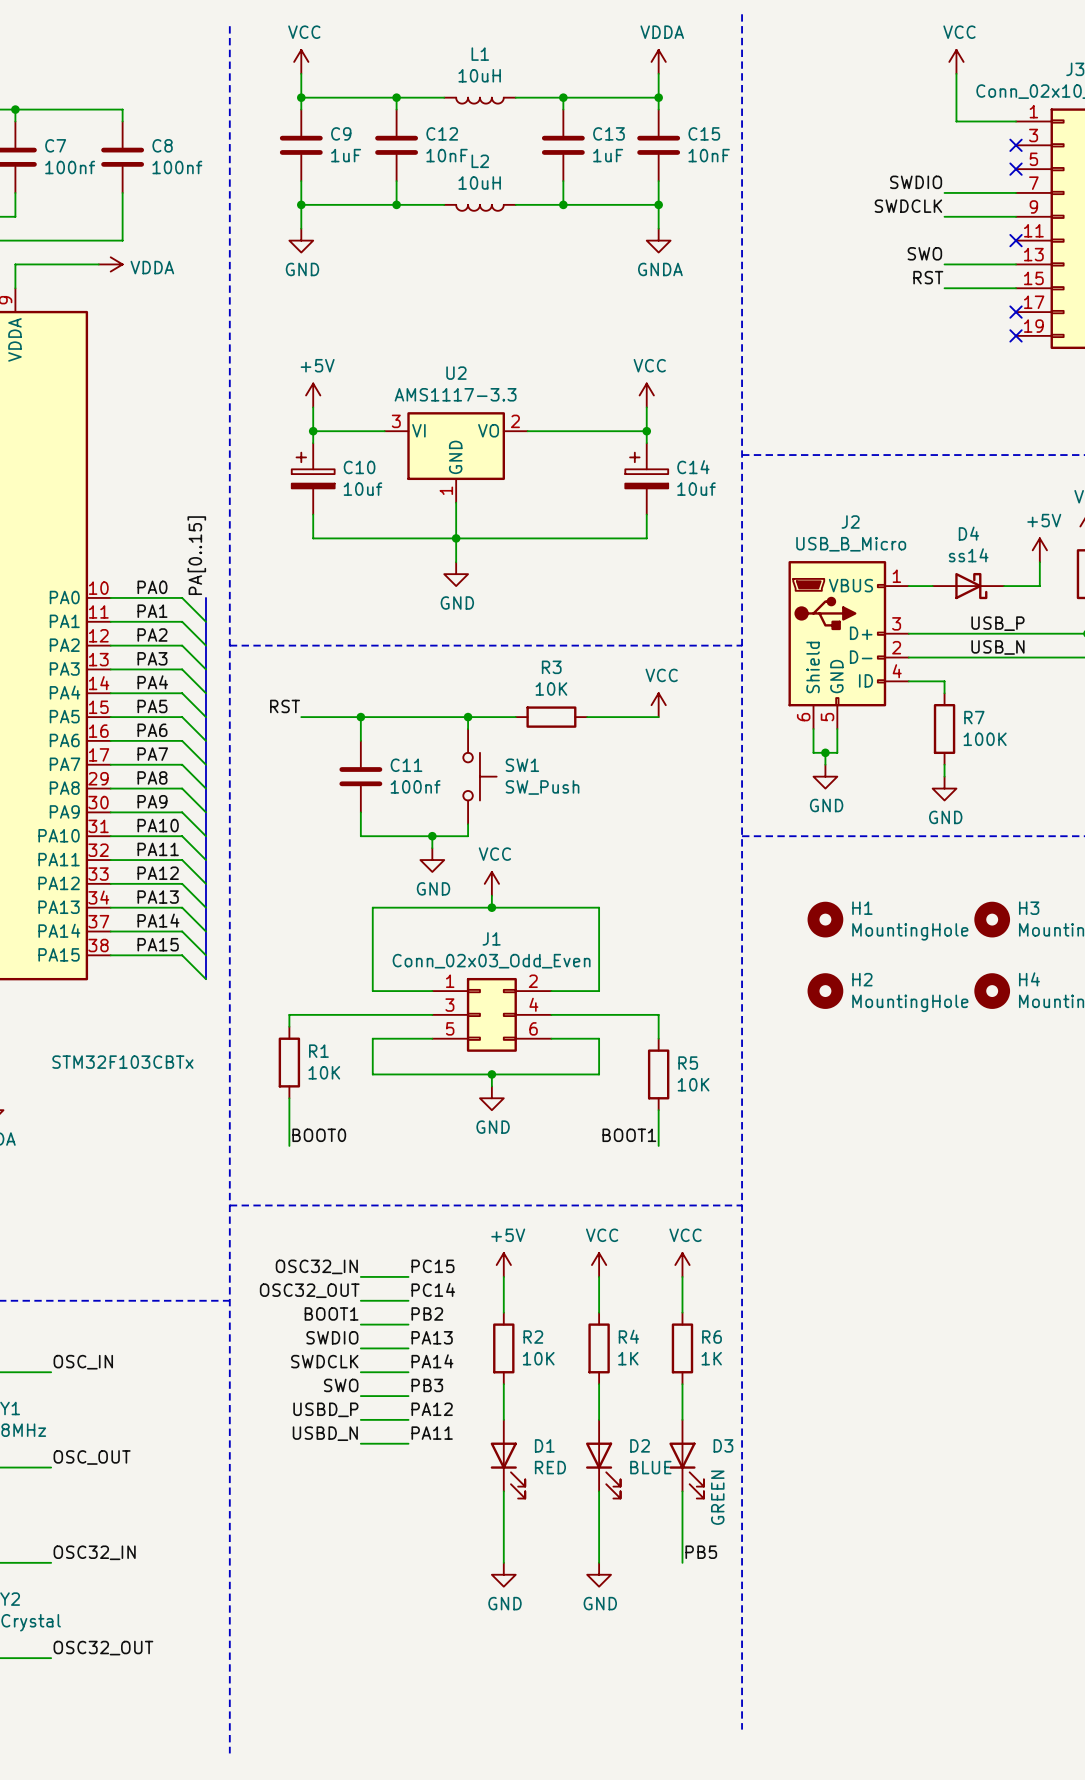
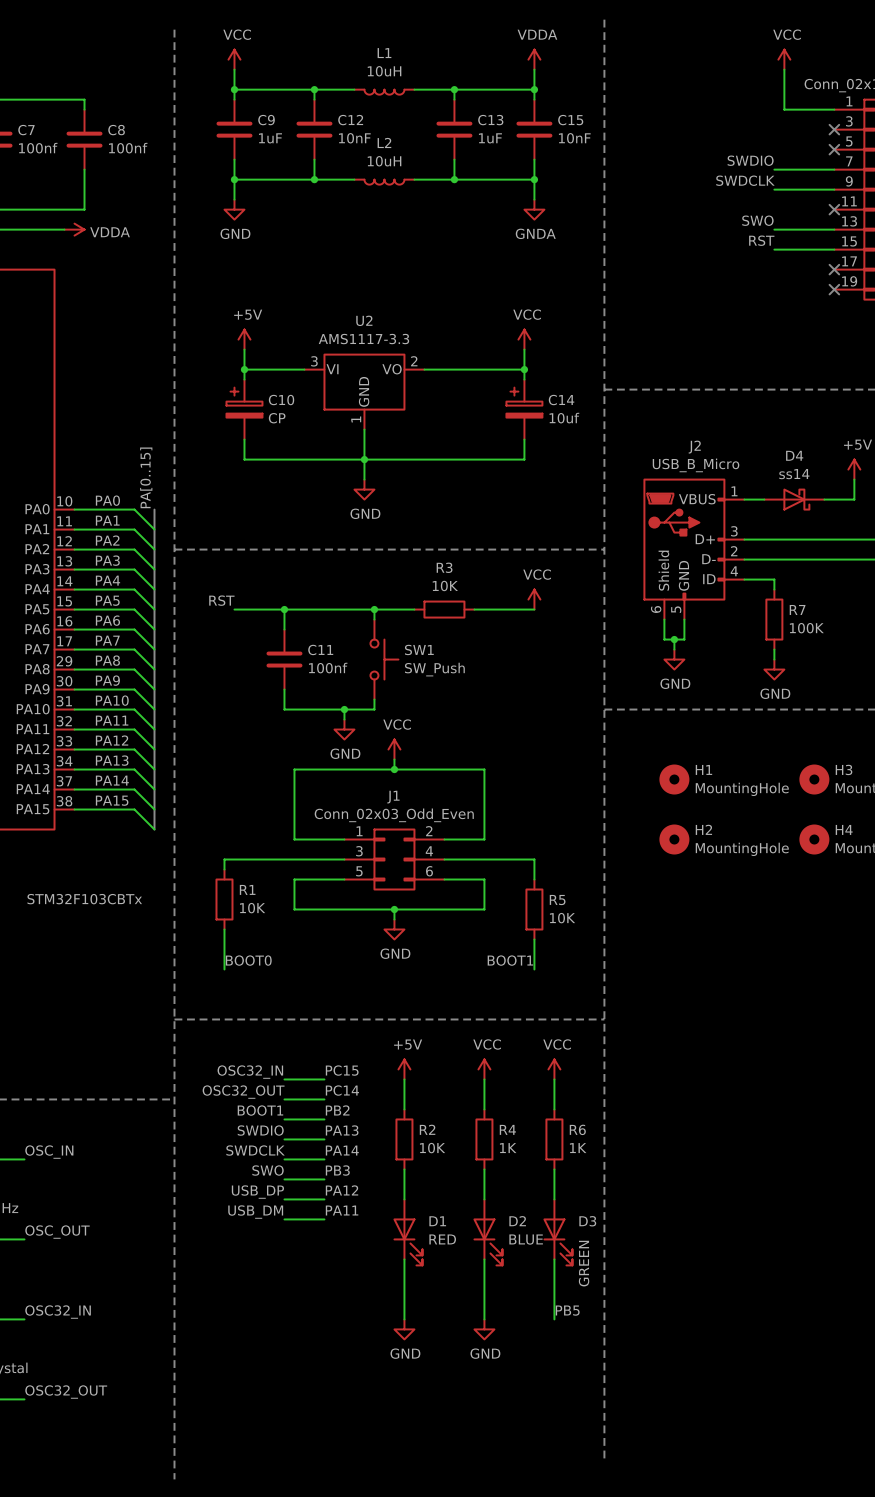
C10 value: 10uf (362, 489) -> CP (277, 418)
label: USB_P (997, 623) -> none
label: USB_N (997, 647) -> none
label: USBD_P (325, 1409) -> USB_DP (257, 1192)
label: USBD_N (325, 1433) -> USB_DM (255, 1212)

